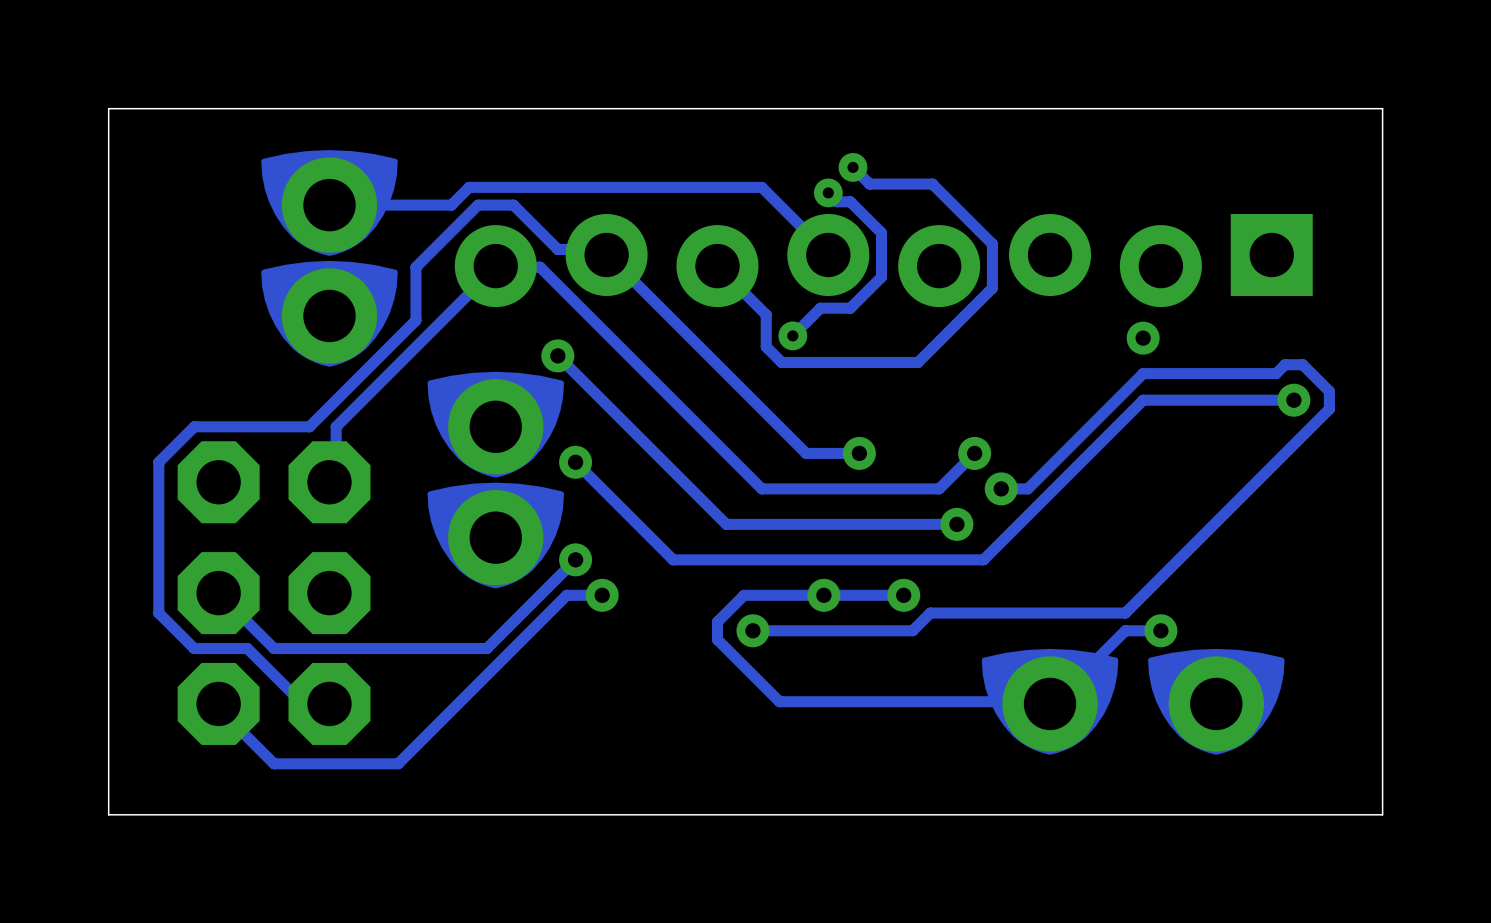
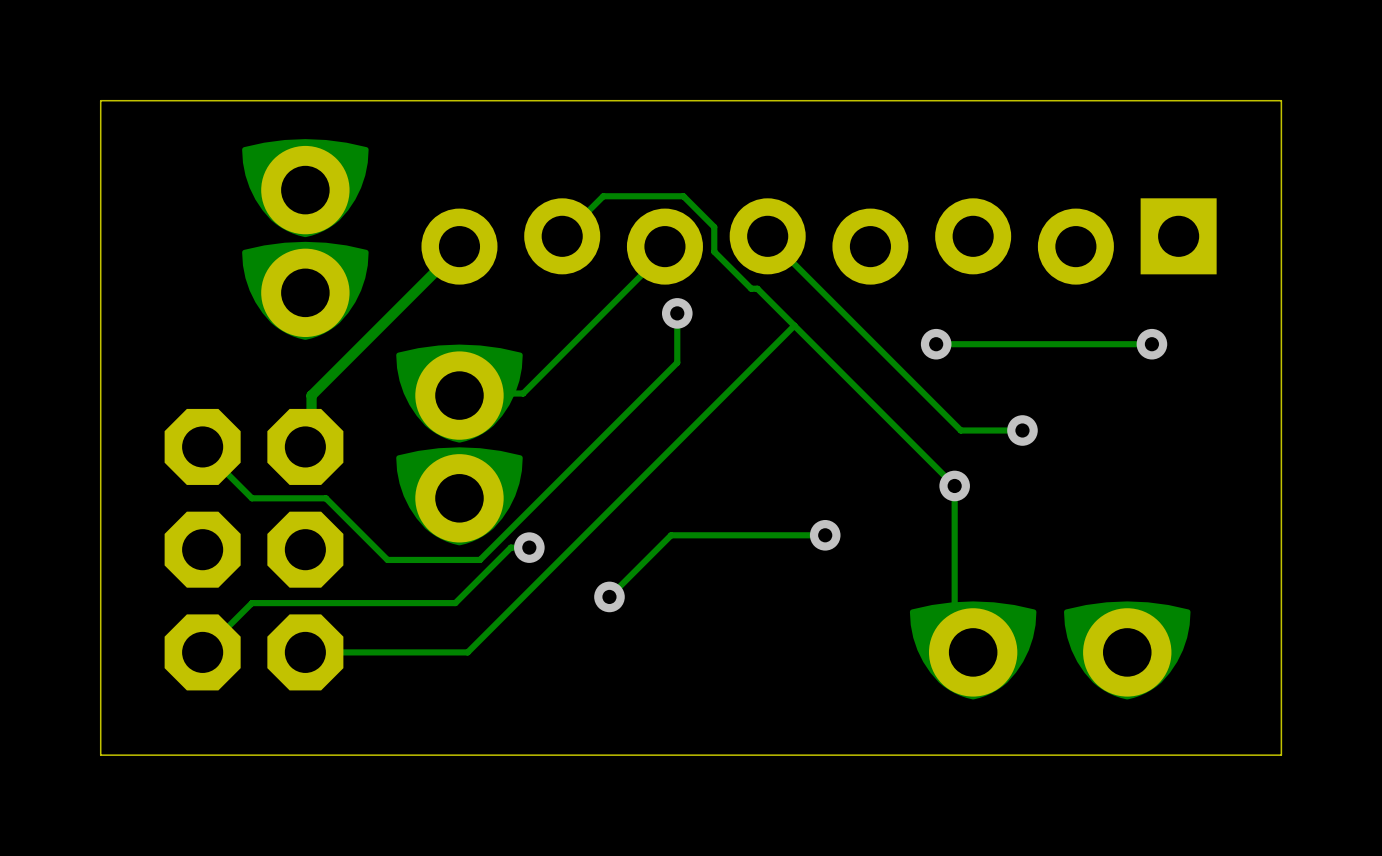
track: (853, 167) (869, 184) (932, 184) (992, 244) (992, 288) (918, 362) (781, 362) (766, 346) (766, 314) (717, 266) -> (459, 395) (461, 393) (523, 393) (664, 251) (664, 246)
via: (853, 167) -> none
track: (828, 192) (837, 201) (850, 201) (881, 232) (881, 277) (850, 308) (820, 308) (792, 335) -> none
via: (828, 192) -> none
track: (329, 205) (451, 205) (469, 187) (761, 187) (828, 255) -> (1022, 430) (960, 430) (767, 236)
track: none -> (562, 236) (603, 196) (683, 196) (714, 227) (714, 251) (751, 288) (757, 288) (954, 485) (954, 633) (973, 652)
track: (495, 267) (540, 267) (761, 488) (939, 488) (974, 453) -> none
via: (792, 335) -> none
track: none -> (677, 313) (677, 362) (480, 559) (387, 559) (325, 498) (251, 498) (202, 446)
via: none -> (677, 313)
via: (1143, 338) -> none
track: (557, 355) (726, 524) (956, 524) -> none
via: (557, 355) -> none
via: none -> (936, 344)
track: none -> (1151, 344) (936, 344)
via: none -> (1151, 344)
track: (1293, 400) (1143, 400) (983, 559) (673, 559) (575, 462) -> none
via: (1293, 400) -> none
track: (859, 453) (806, 453) (602, 249) (557, 249) (513, 205) (478, 205) (415, 267) (415, 320) (309, 426) (194, 426) (158, 462) (158, 613) (194, 648) (247, 648) (300, 701) (327, 701) (329, 703) -> (794, 325) (467, 652) (305, 652)
via: (859, 453) -> none
via: (974, 453) -> none
via: (575, 462) -> none
via: none -> (1022, 430)
track: (1001, 488) (1027, 488) (1143, 373) (1276, 373) (1285, 364) (1302, 364) (1329, 391) (1329, 409) (1125, 613) (930, 613) (912, 630) (752, 630) -> none
via: (1001, 488) -> none
via: (956, 524) -> none
via: none -> (954, 485)
track: (575, 559) (486, 648) (274, 648) (218, 593) -> none
via: (575, 559) -> none
track: none -> (825, 535) (671, 535) (609, 596)
via: none -> (529, 547)
track: (602, 595) (566, 595) (398, 763) (274, 763) (220, 710) (218, 703) -> (529, 547) (510, 547) (455, 603) (251, 603) (202, 652)
via: (602, 595) -> none
via: (823, 595) -> none
track: (903, 595) (744, 595) (717, 621) (717, 639) (779, 701) (1045, 701) (1050, 703) (1125, 630) (1160, 630) -> none
via position: (903, 595) -> (825, 535)
via: (752, 630) -> none
via: (1160, 630) -> none
via: none -> (609, 596)

